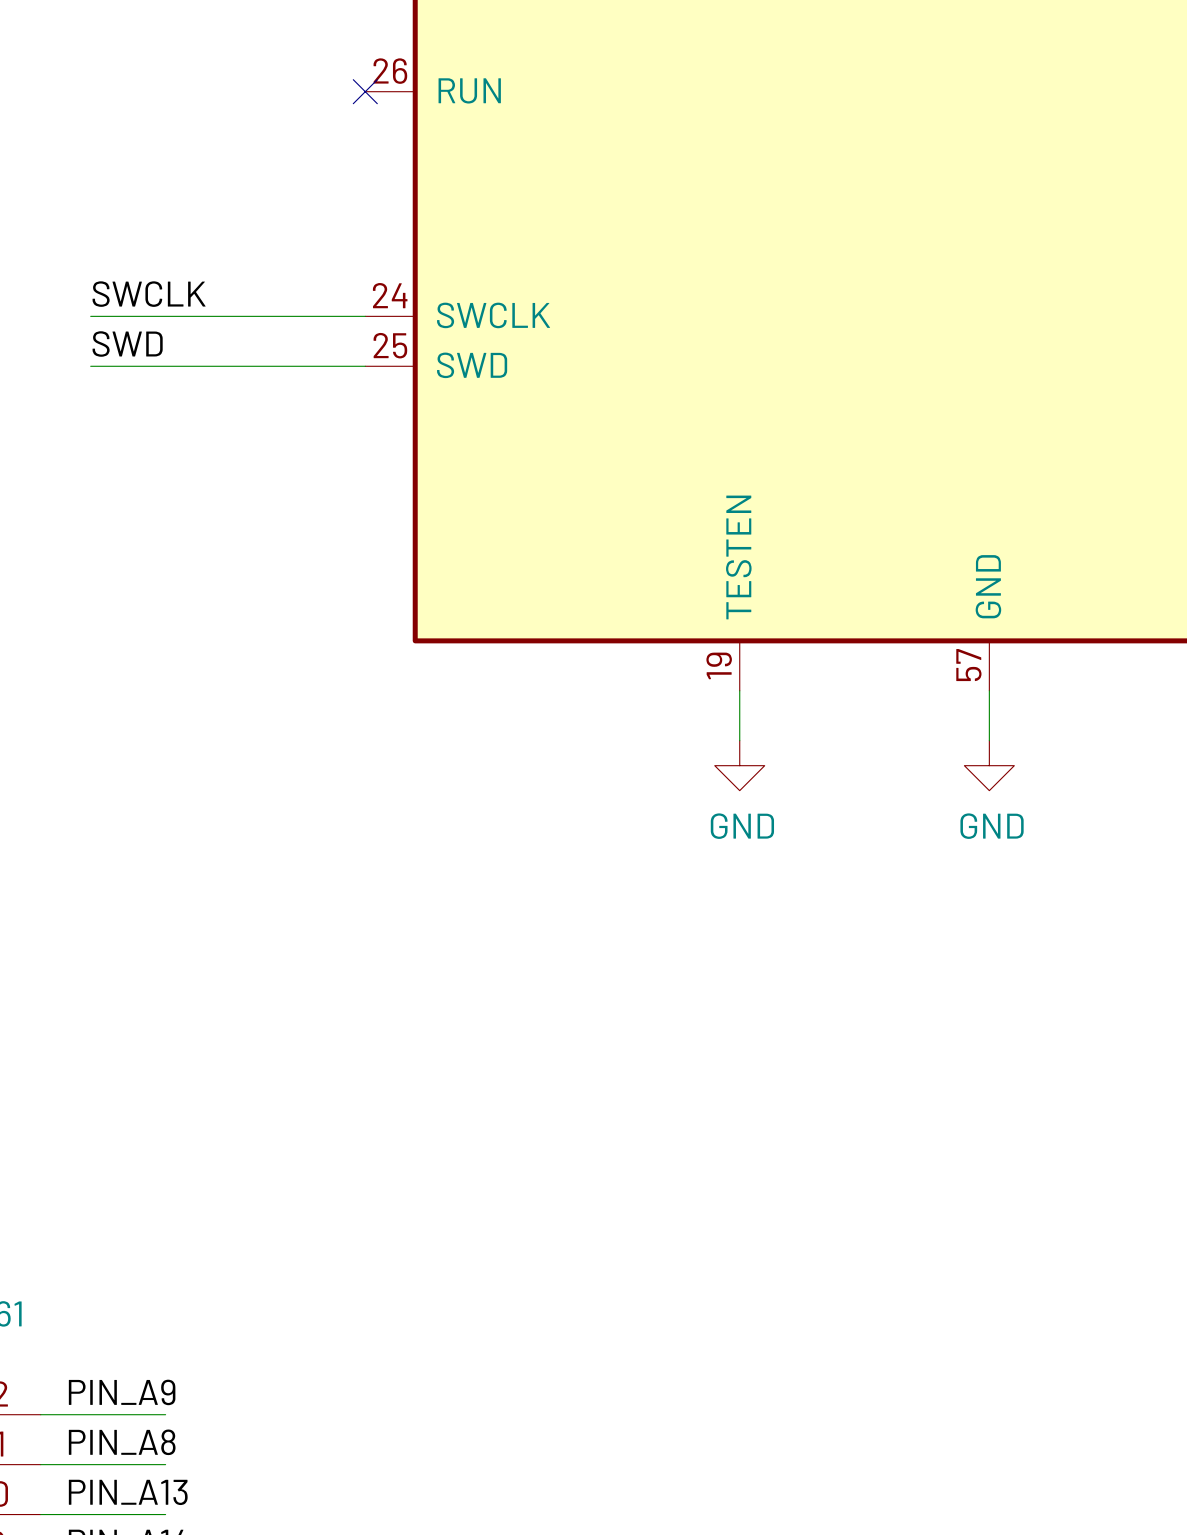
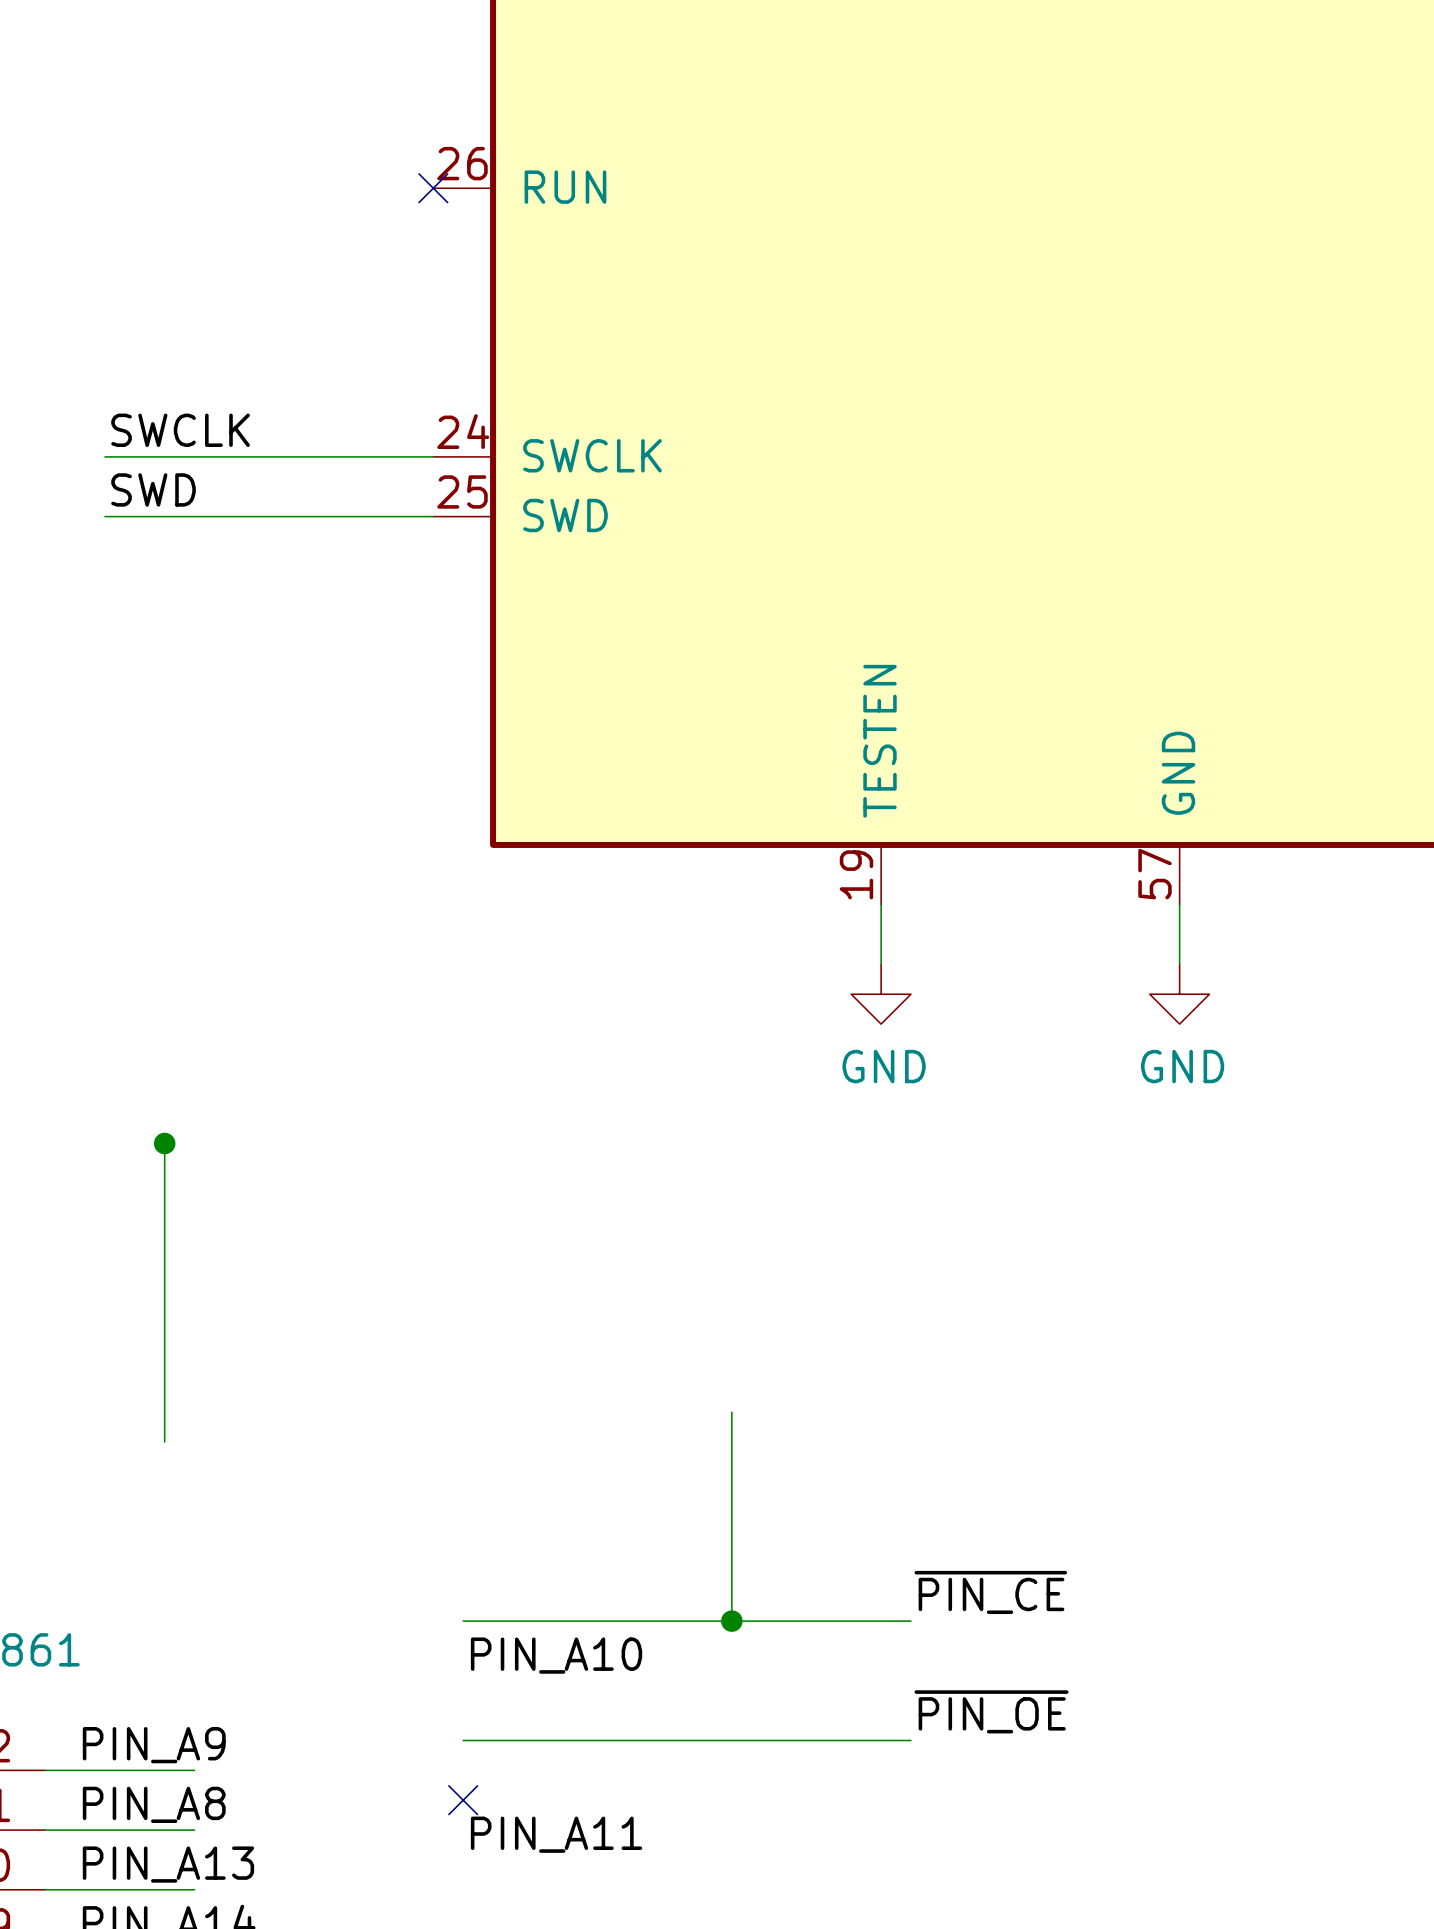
wire: none -> (164, 1143) (164, 1442)
junction: none -> (164, 1143)
wire: none -> (731, 1412) (731, 1621)
label: none -> ~{PIN_CE} (990, 1592)
wire: none -> (463, 1621) (910, 1621)
junction: none -> (731, 1621)
label: none -> PIN_A10 (556, 1655)
label: none -> ~{PIN_OE} (991, 1711)
wire: none -> (463, 1740) (910, 1740)
no-connect mark: none -> (463, 1800)
label: none -> PIN_A11 (556, 1834)

